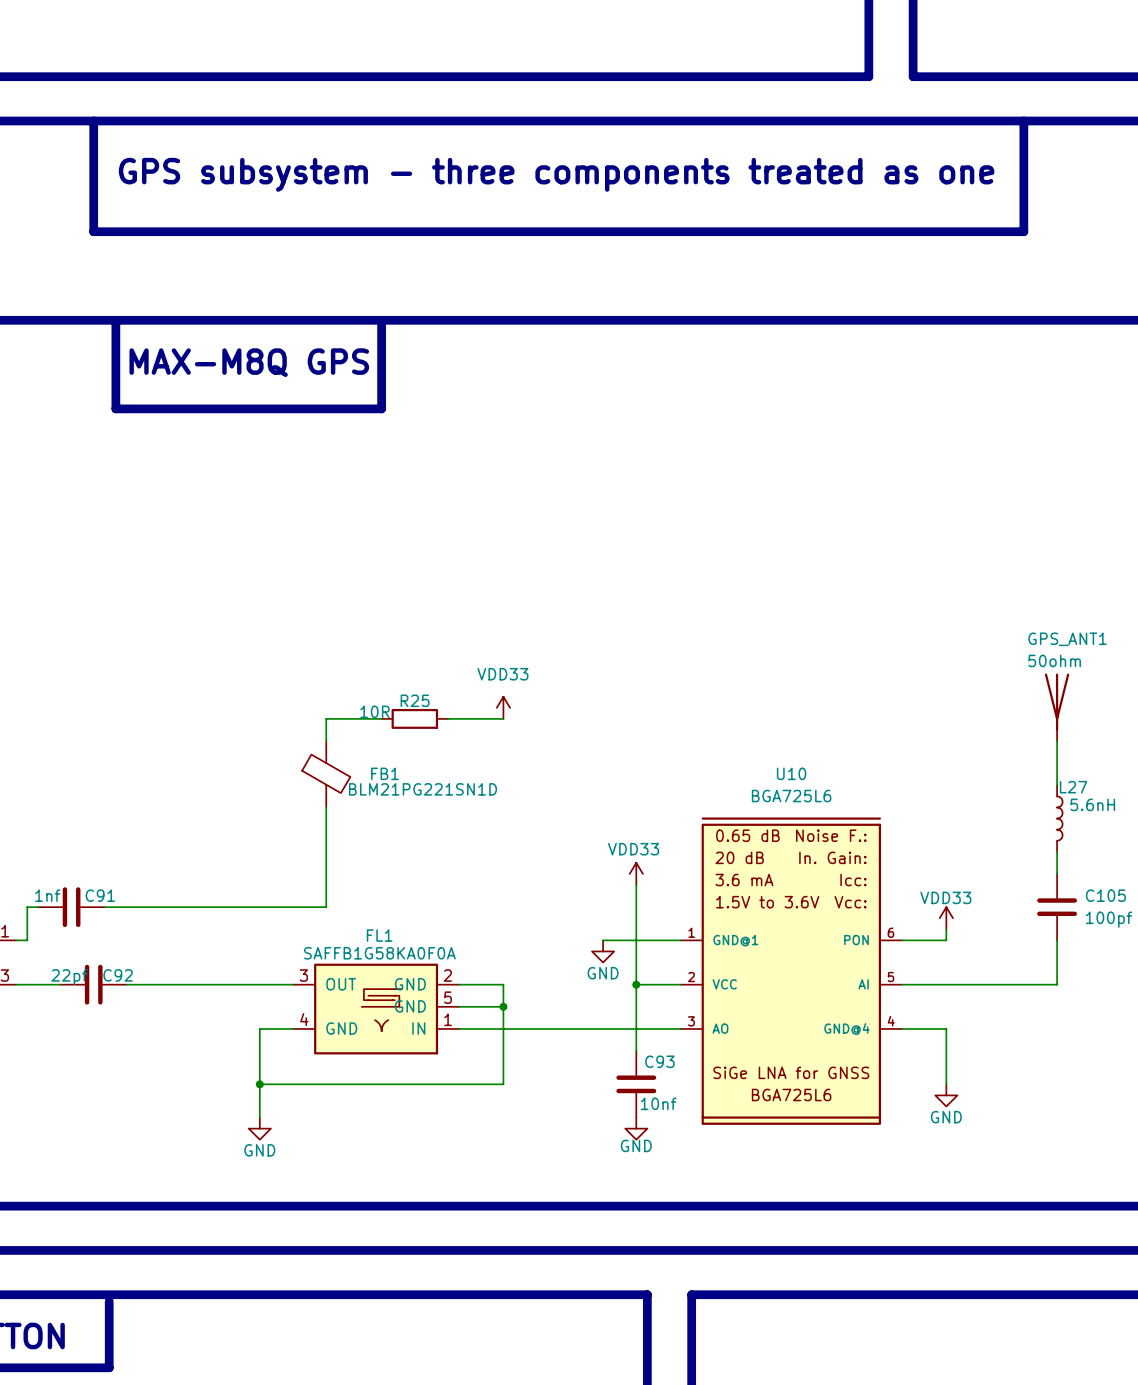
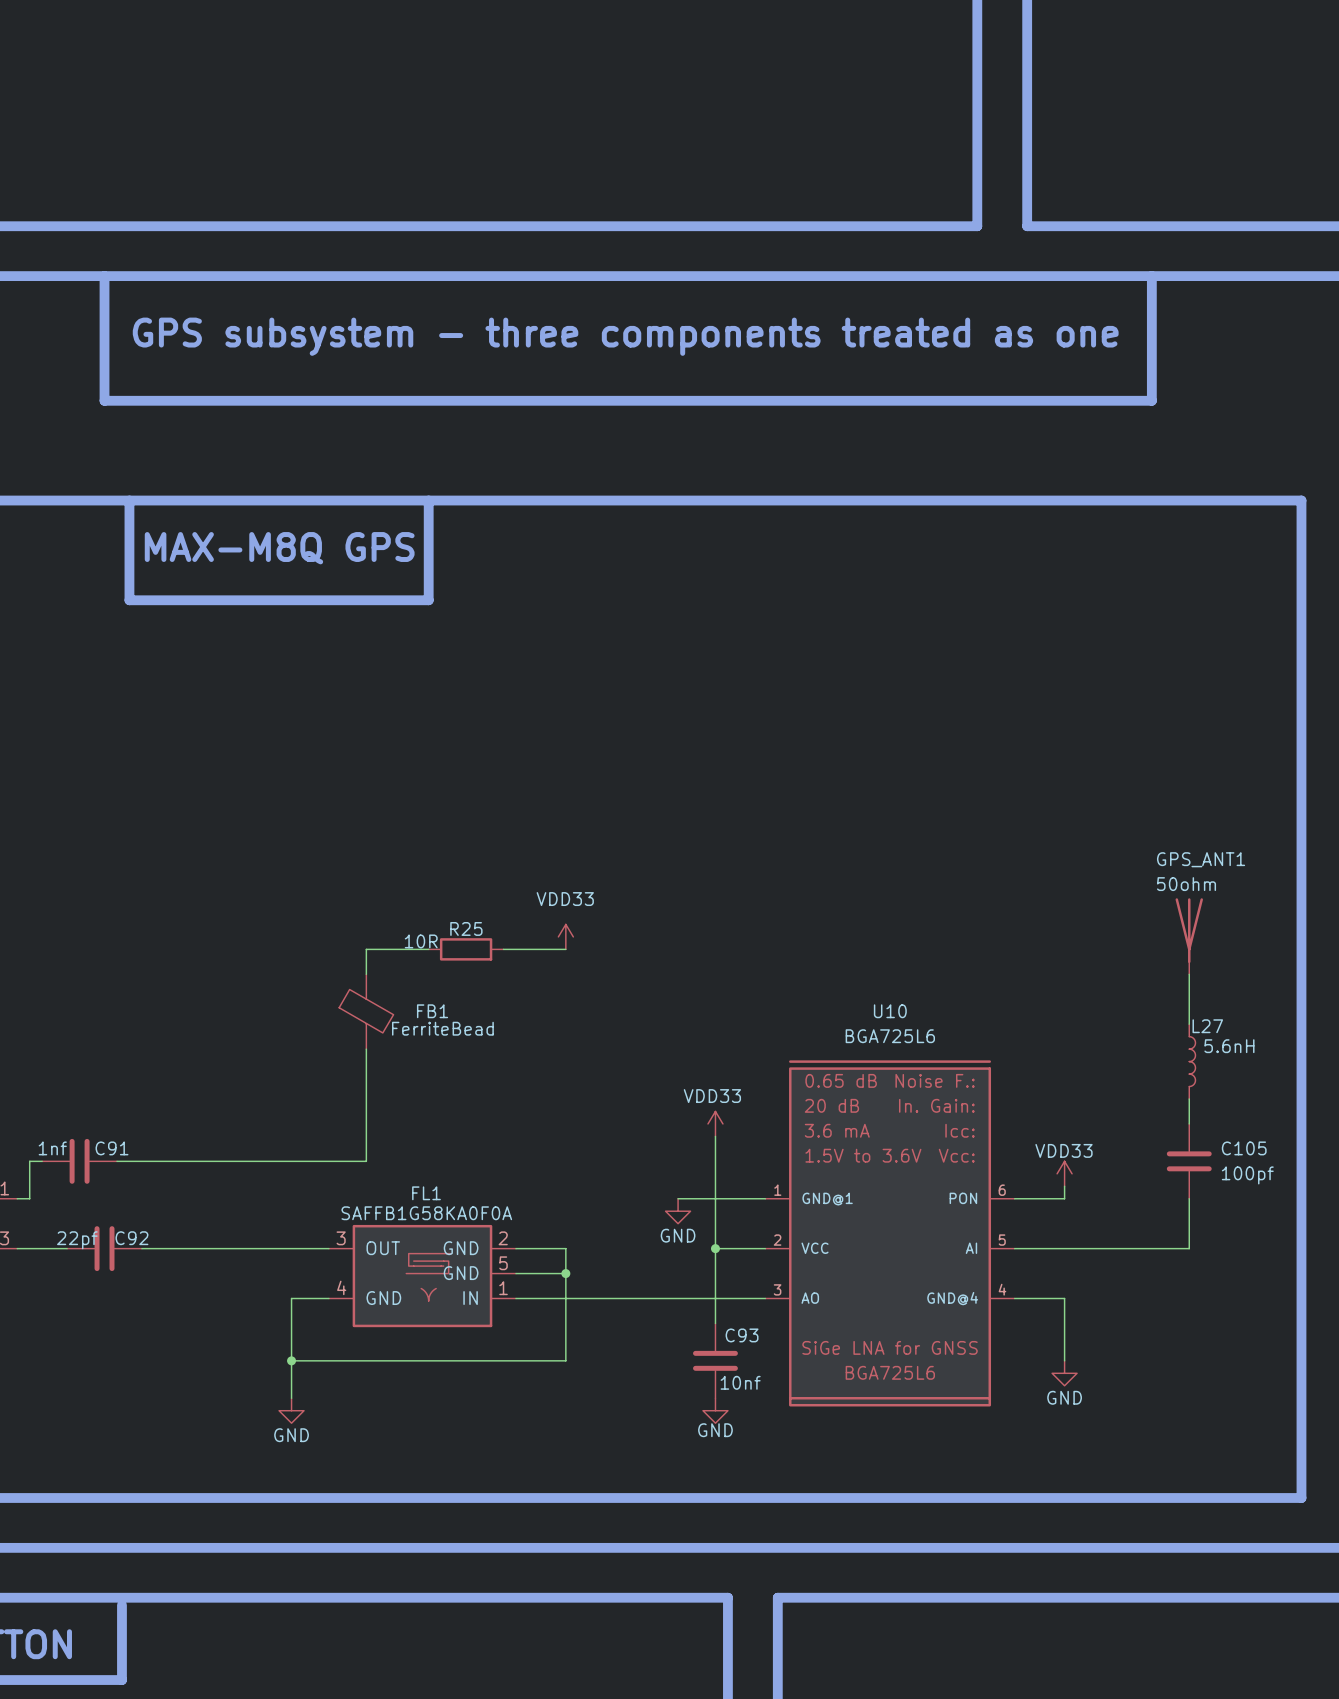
FB1 value: BLM21PG221SN1D (422, 789) -> FerriteBead (442, 1028)

